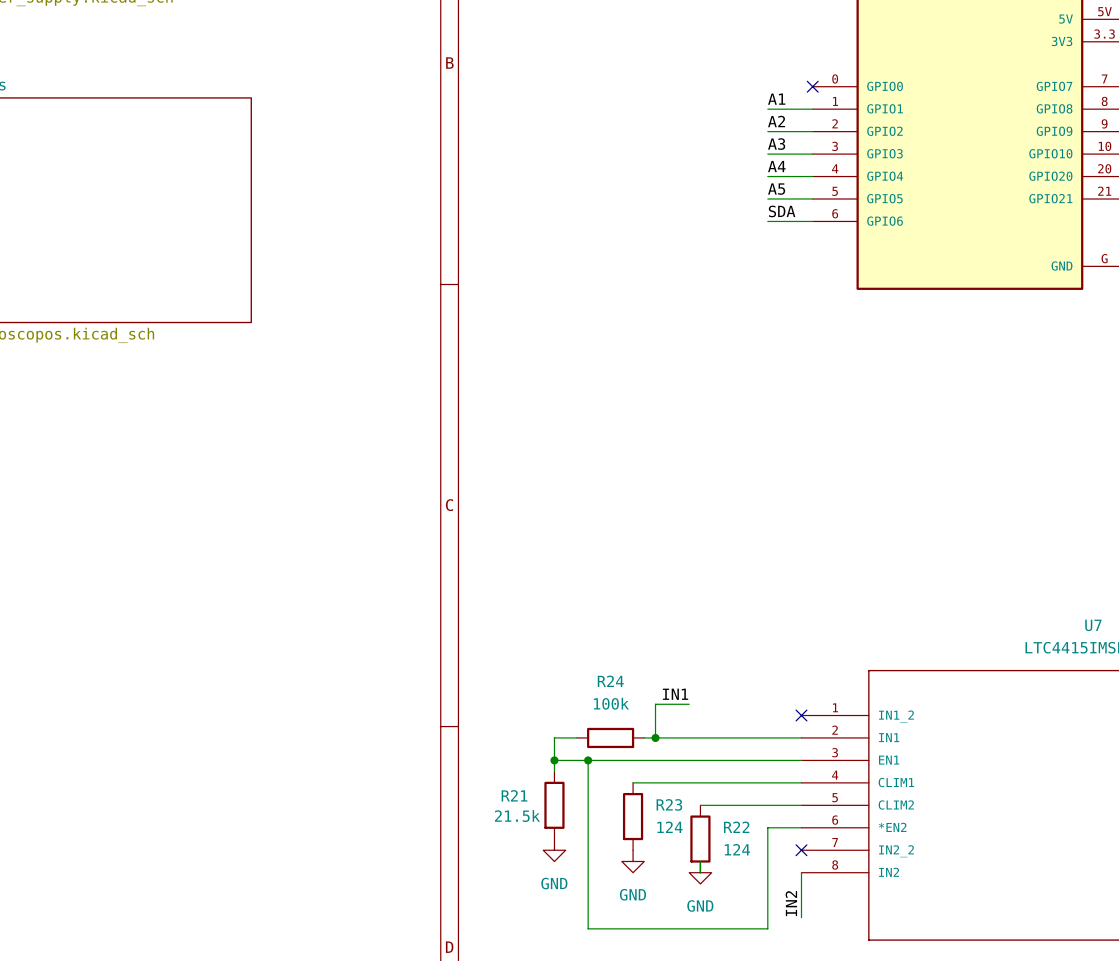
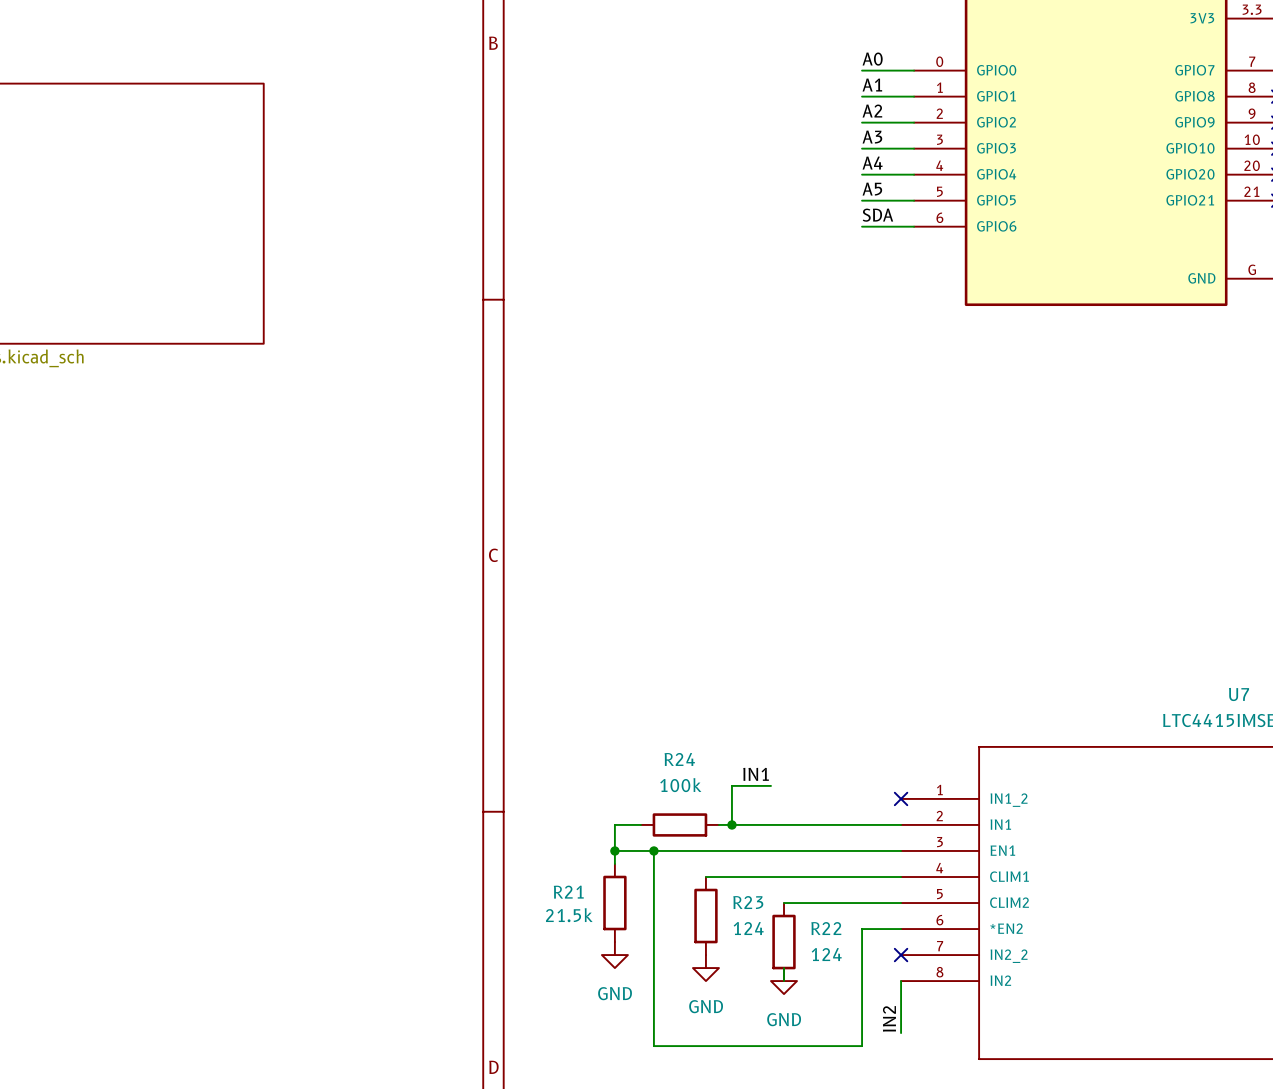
label: none -> A0 (872, 59)
wire: none -> (862, 70) (914, 70)
no-connect mark: (812, 86) -> none

